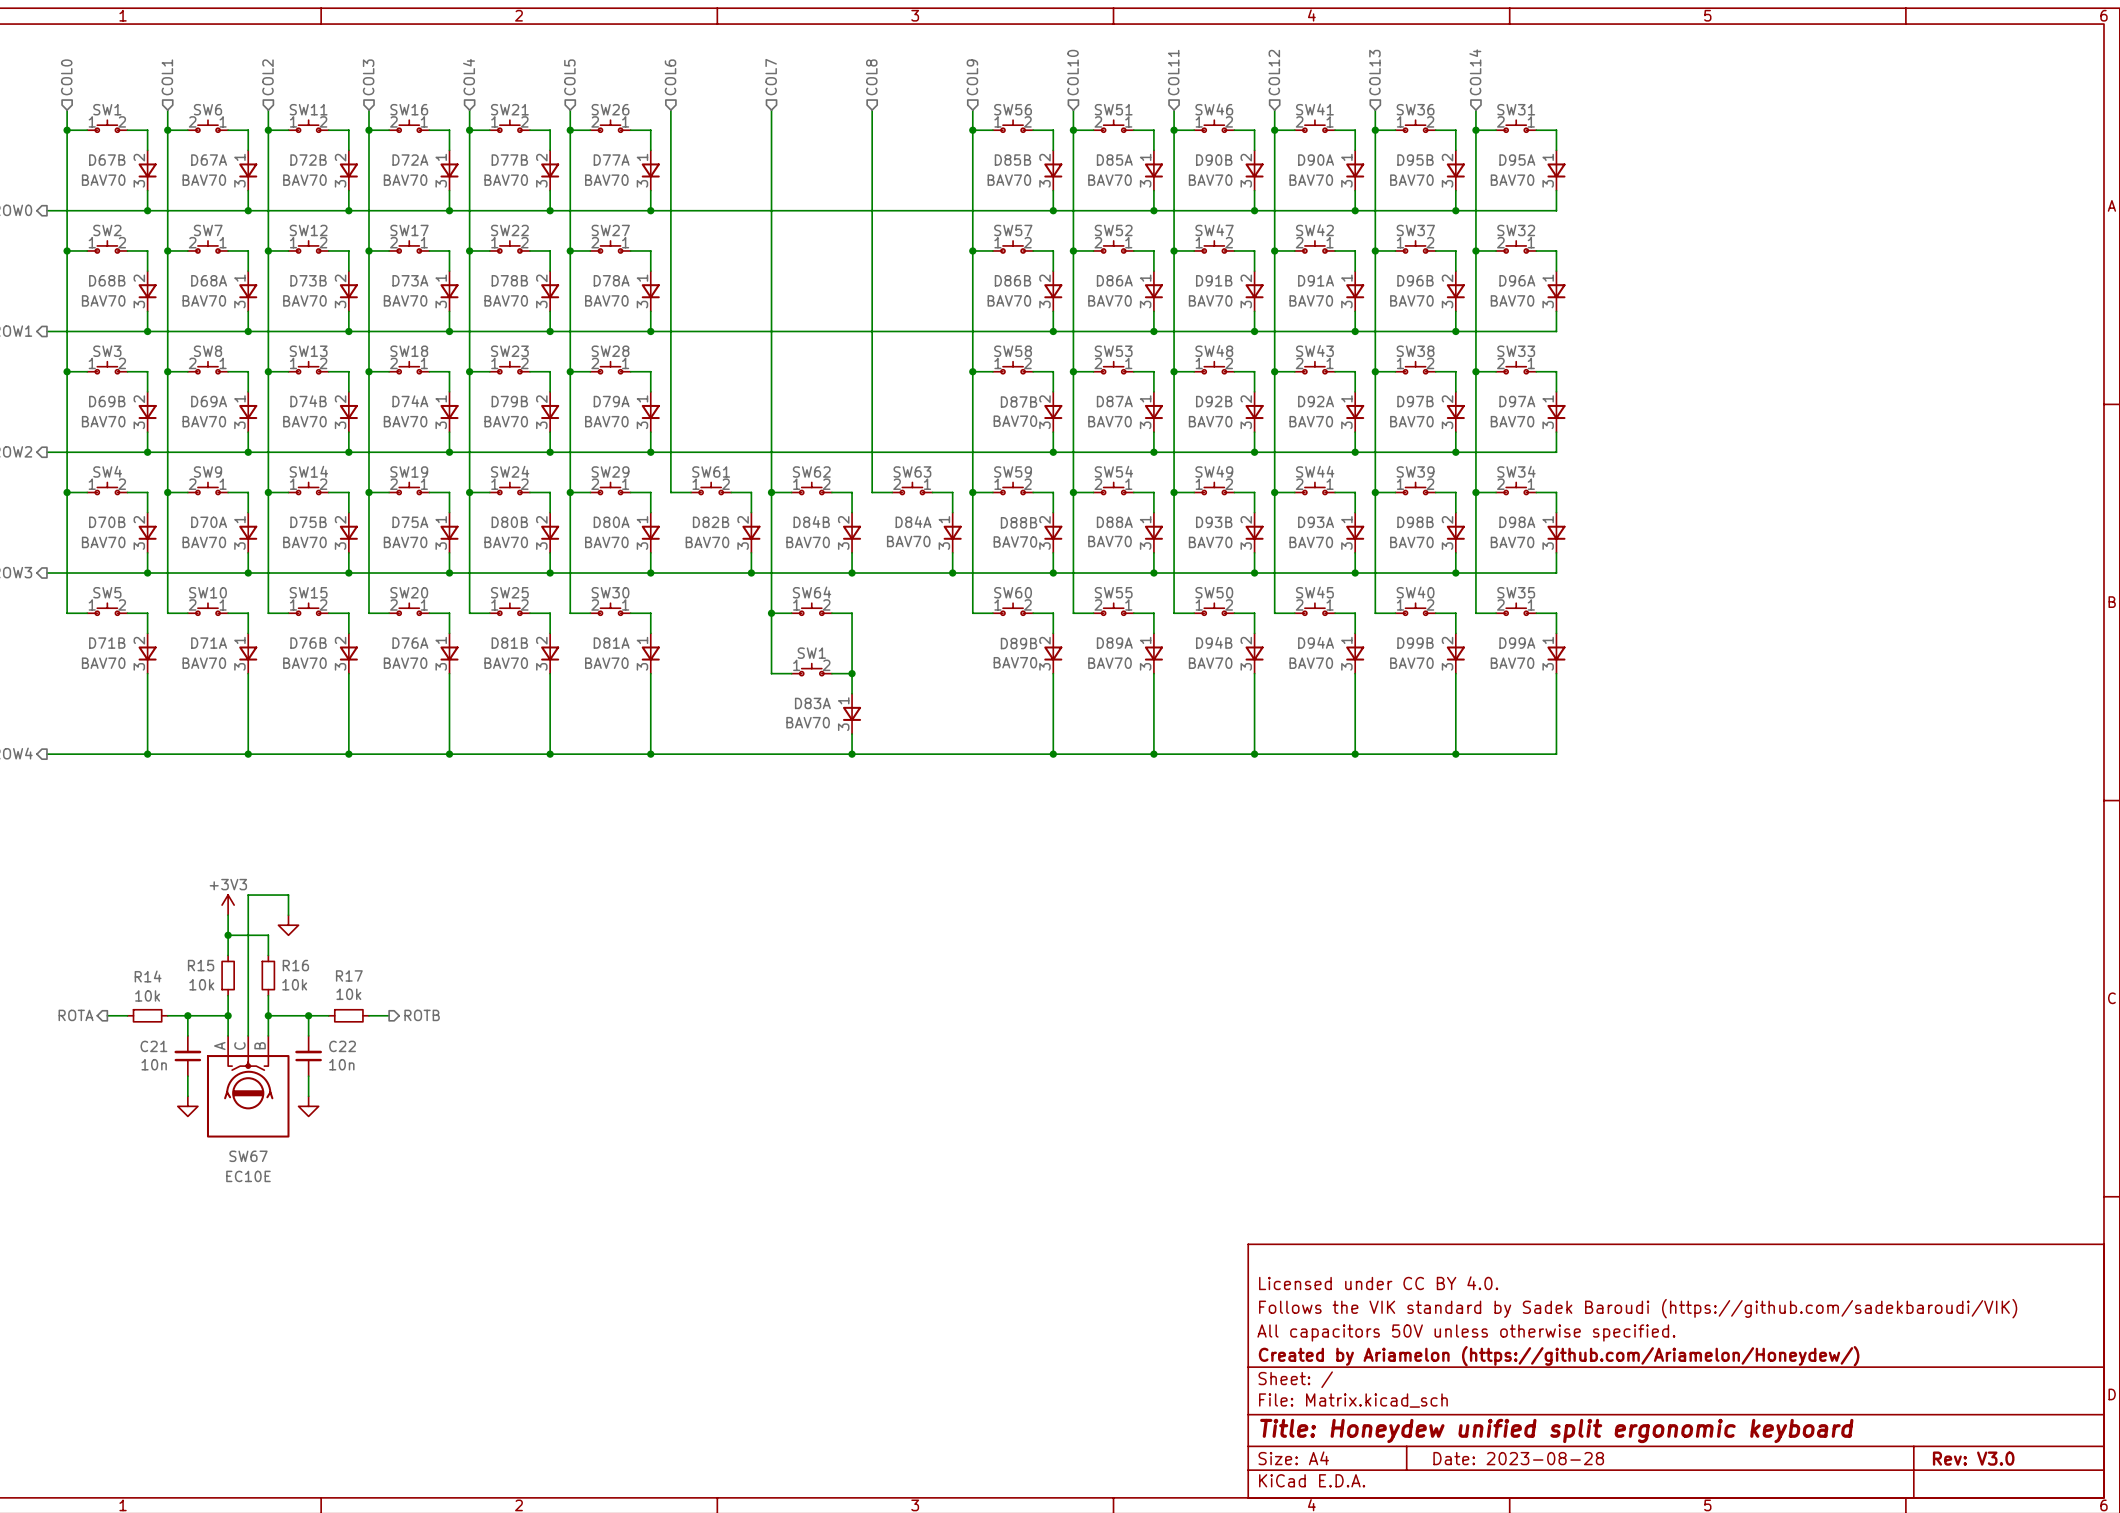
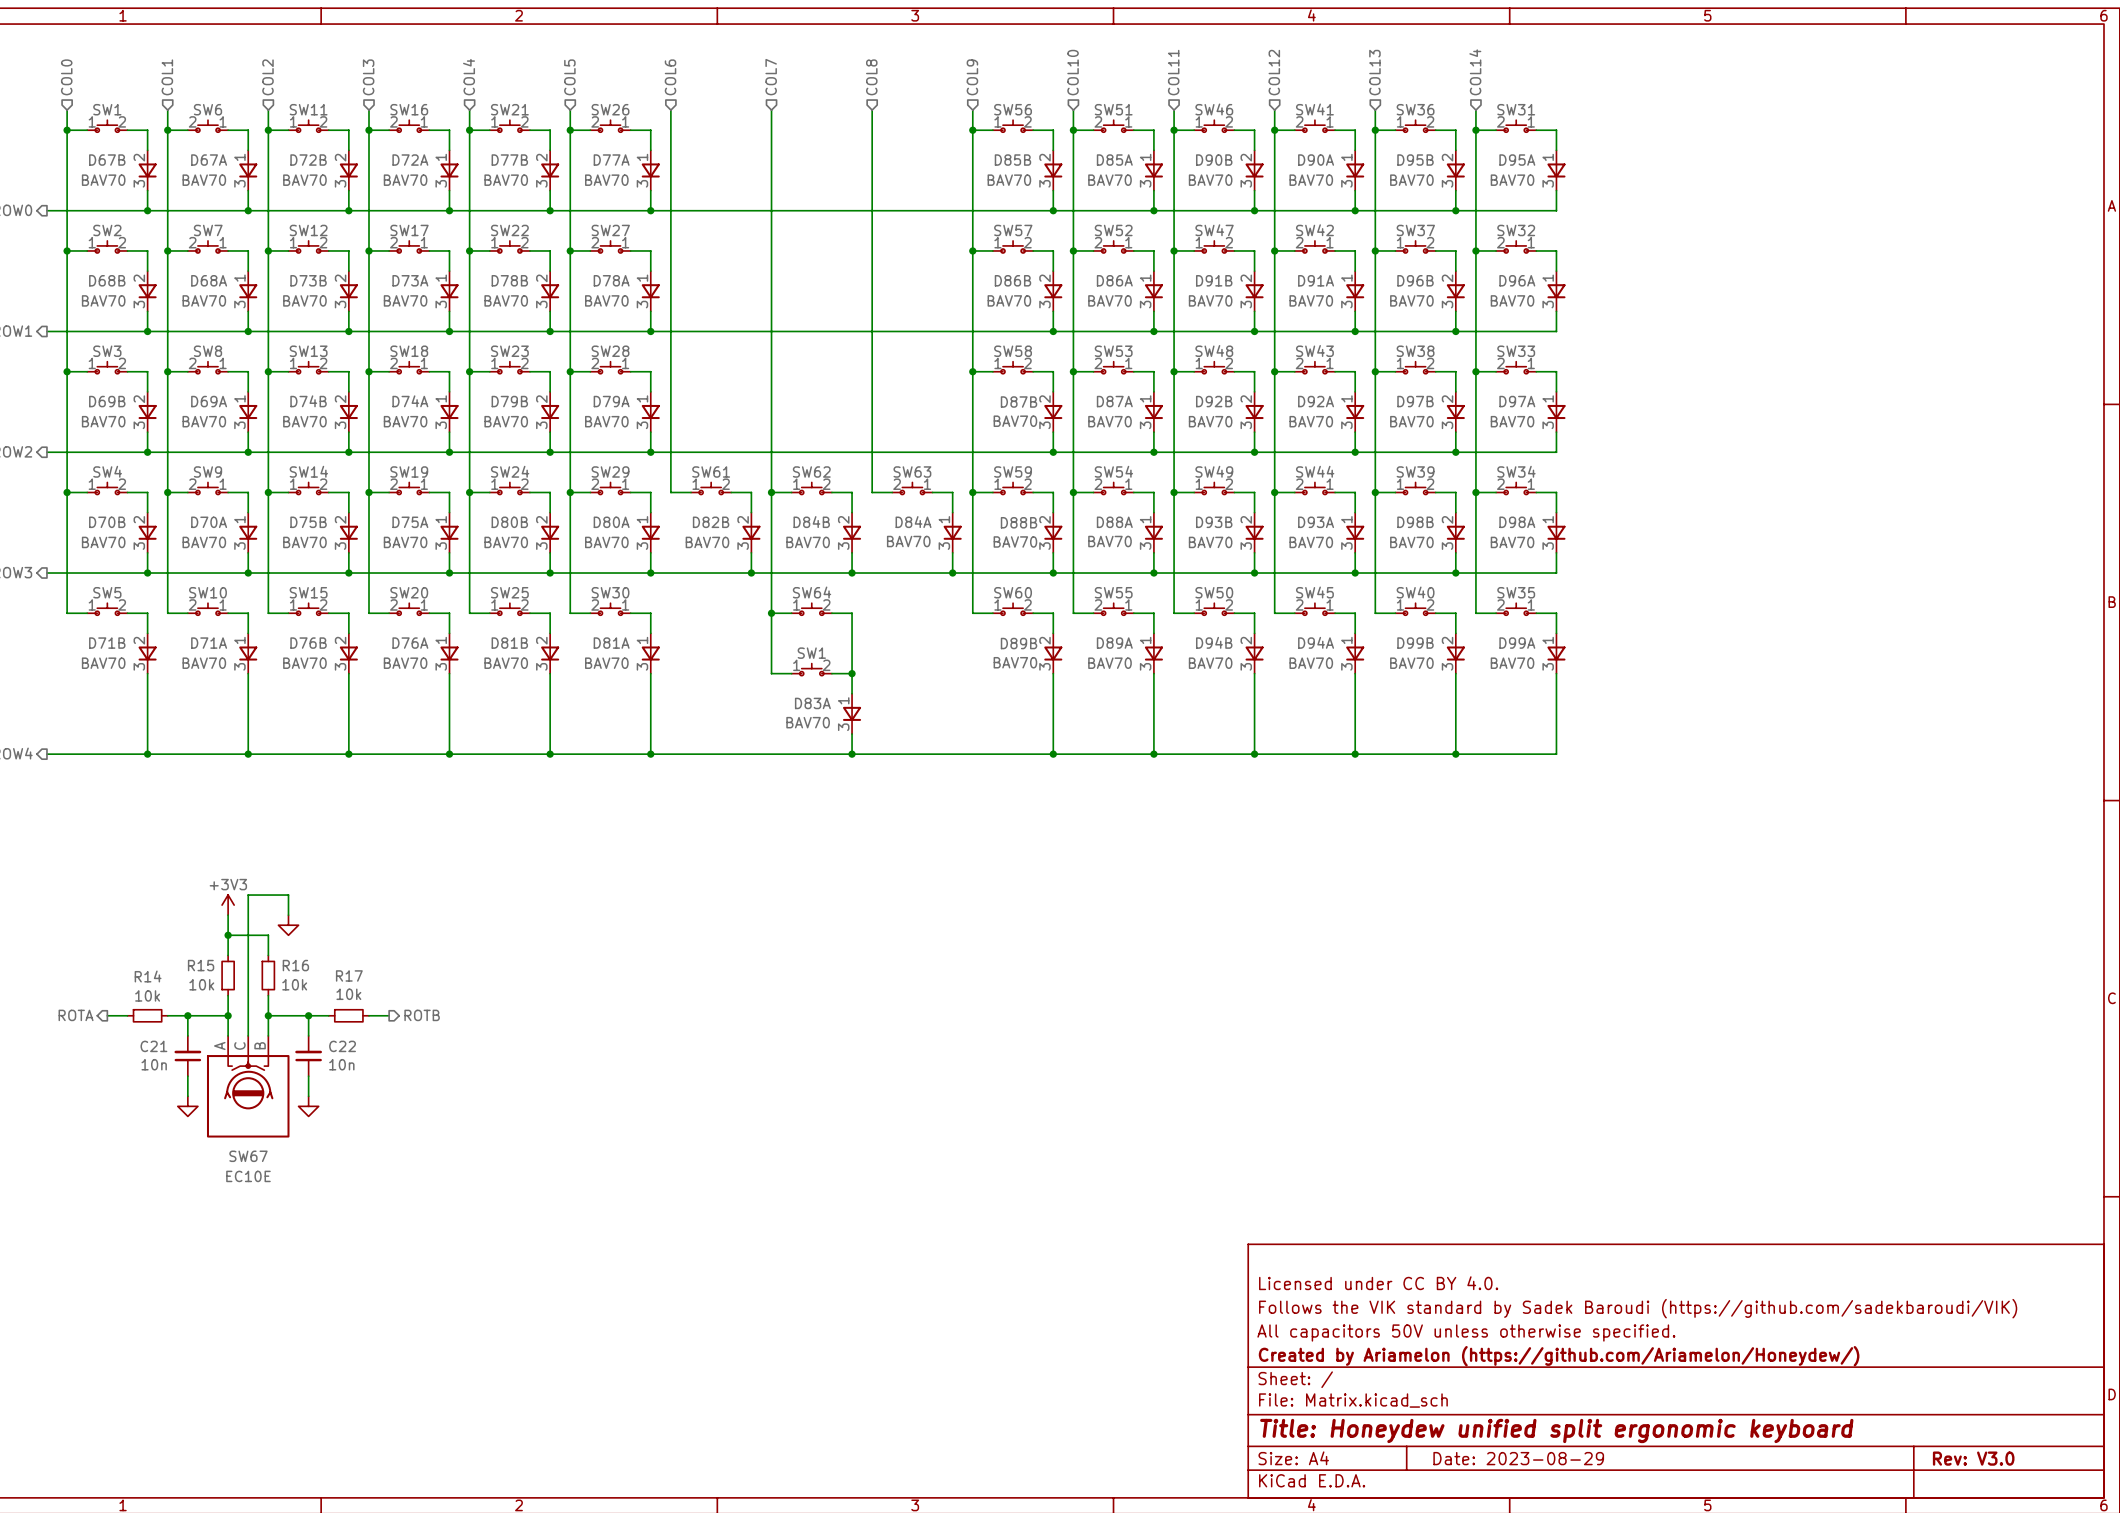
title block: Date: 2023-08-28 (1518, 1458) -> Date: 2023-08-29 (1518, 1458)

